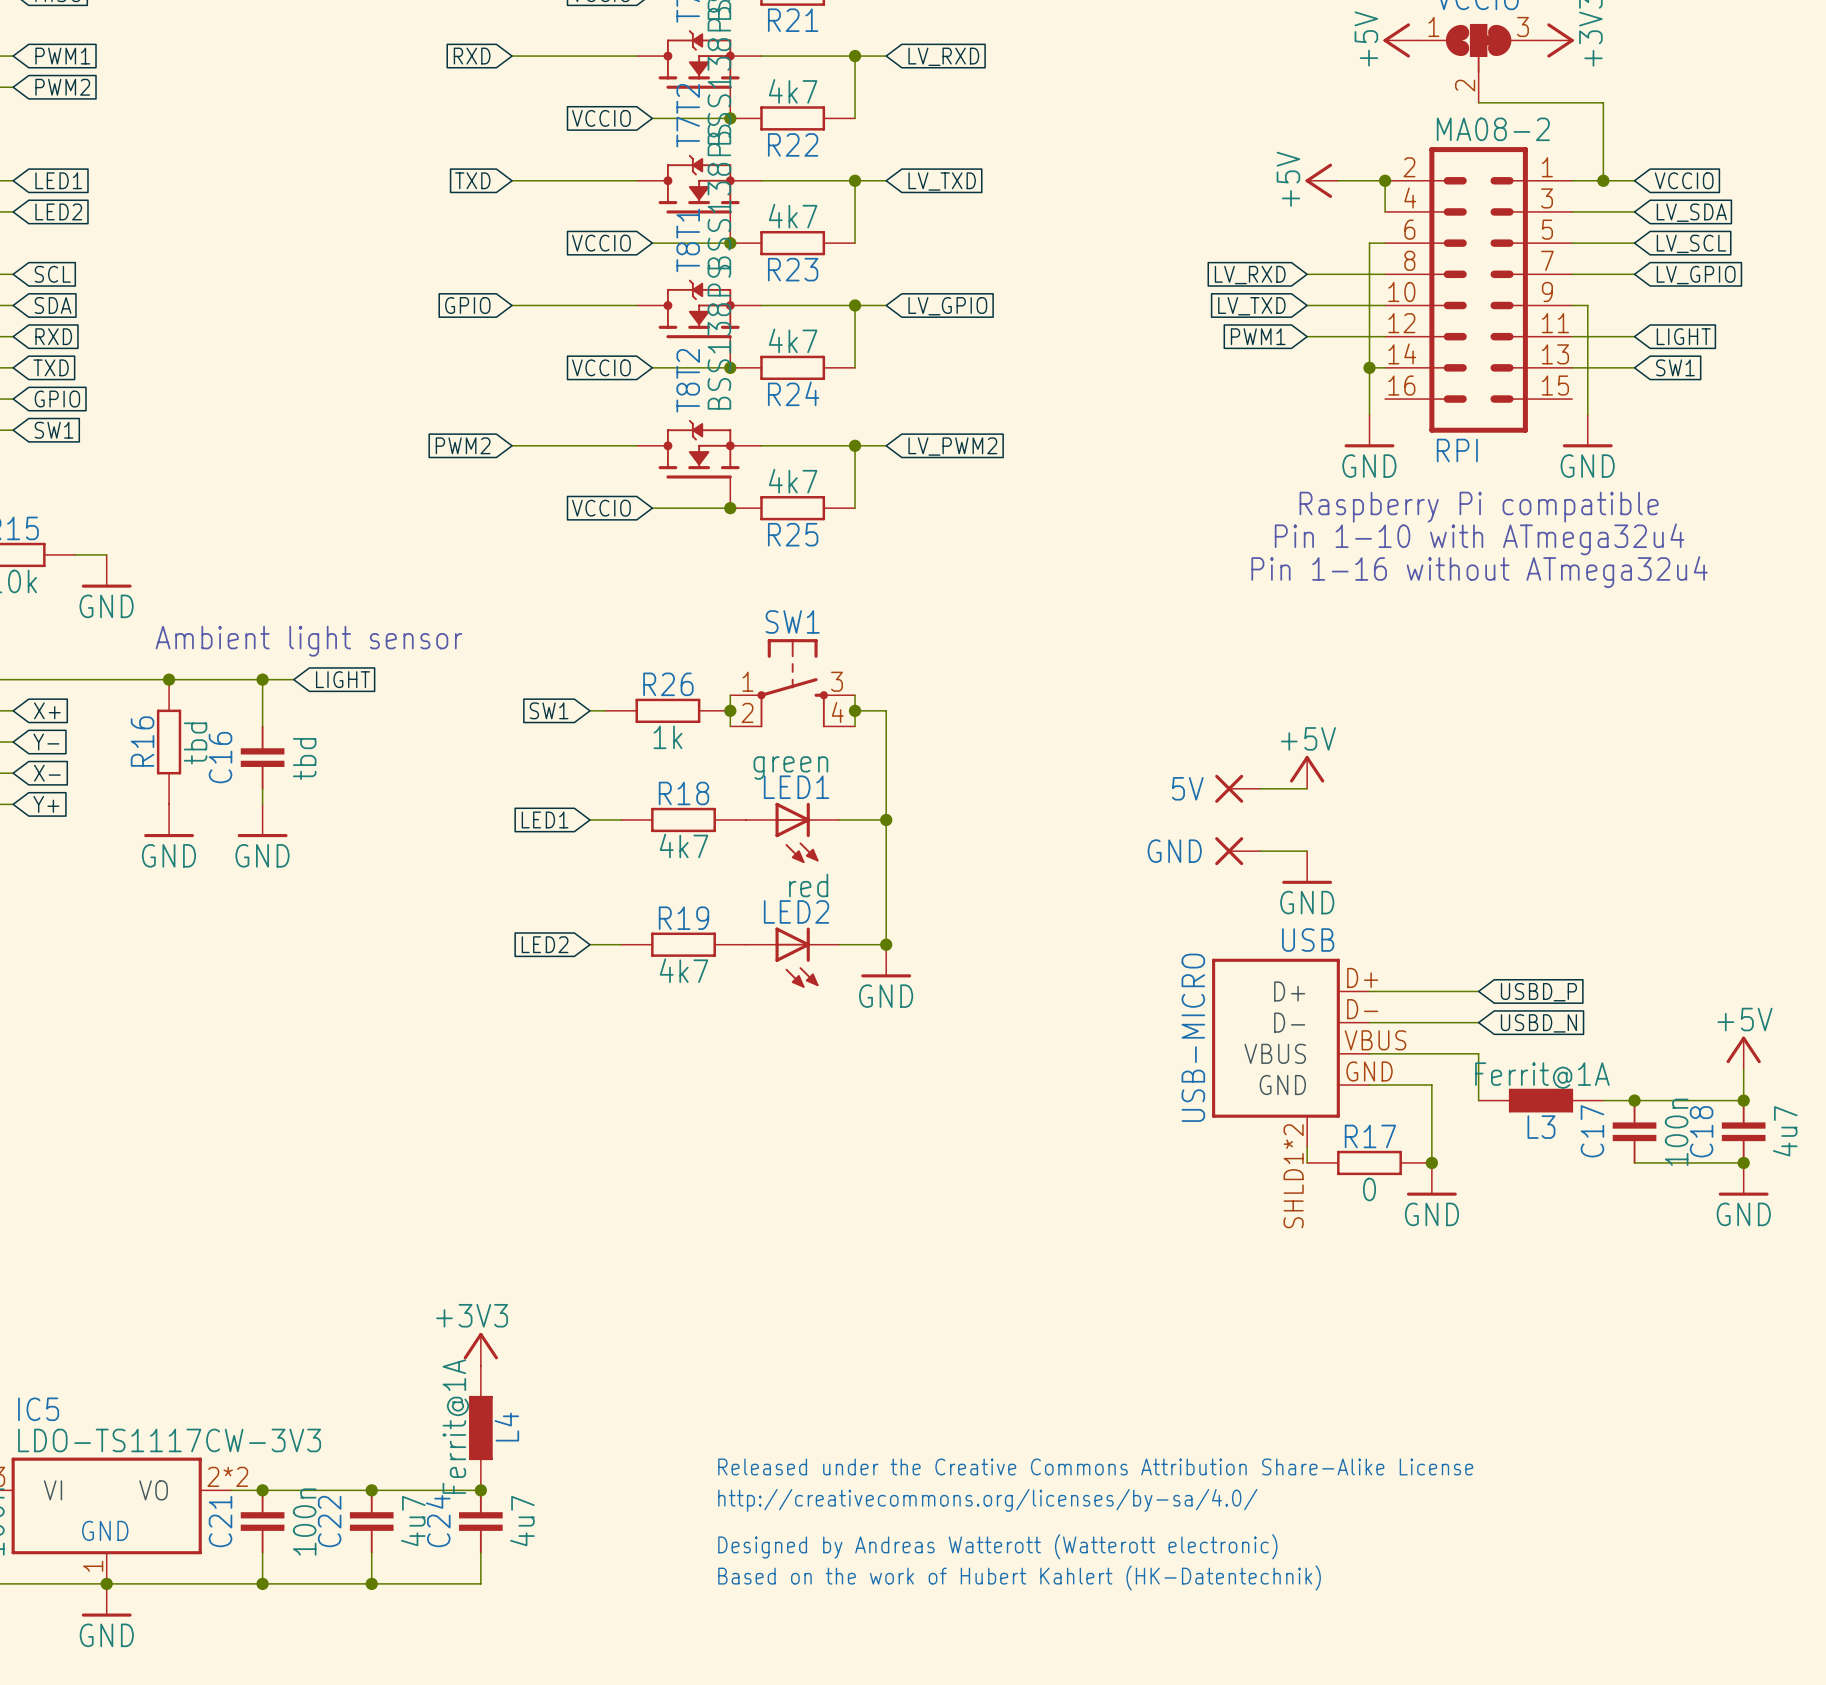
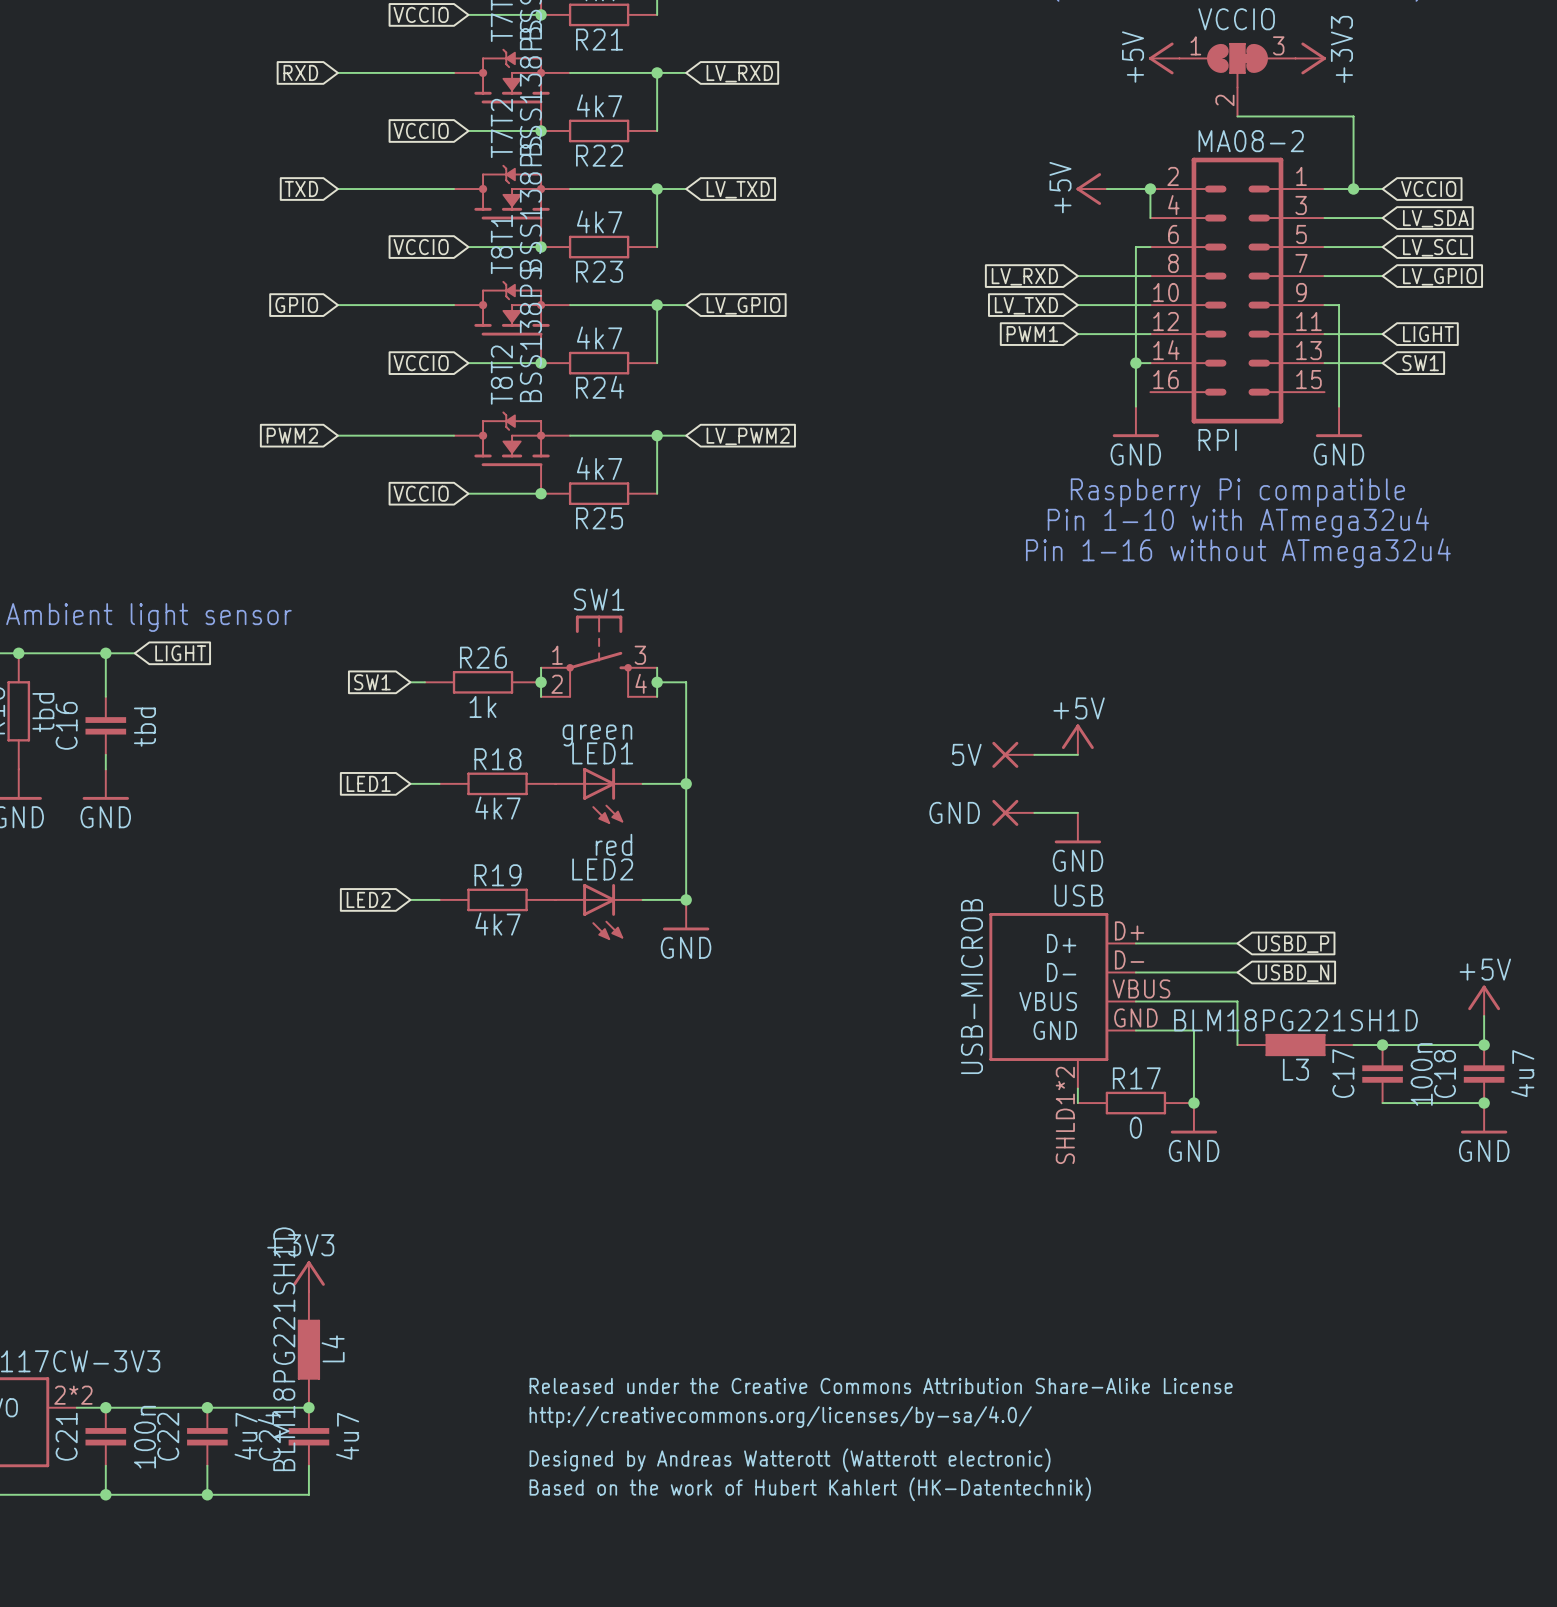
USB value: USB-MICRO (1193, 1037) -> USB-MICROB (971, 986)
L3 value: Ferrit@1A (1542, 1075) -> BLM18PG221SH1D (1295, 1020)
L4 value: Ferrit@1A (455, 1426) -> BLM18PG221SH1D (284, 1349)

